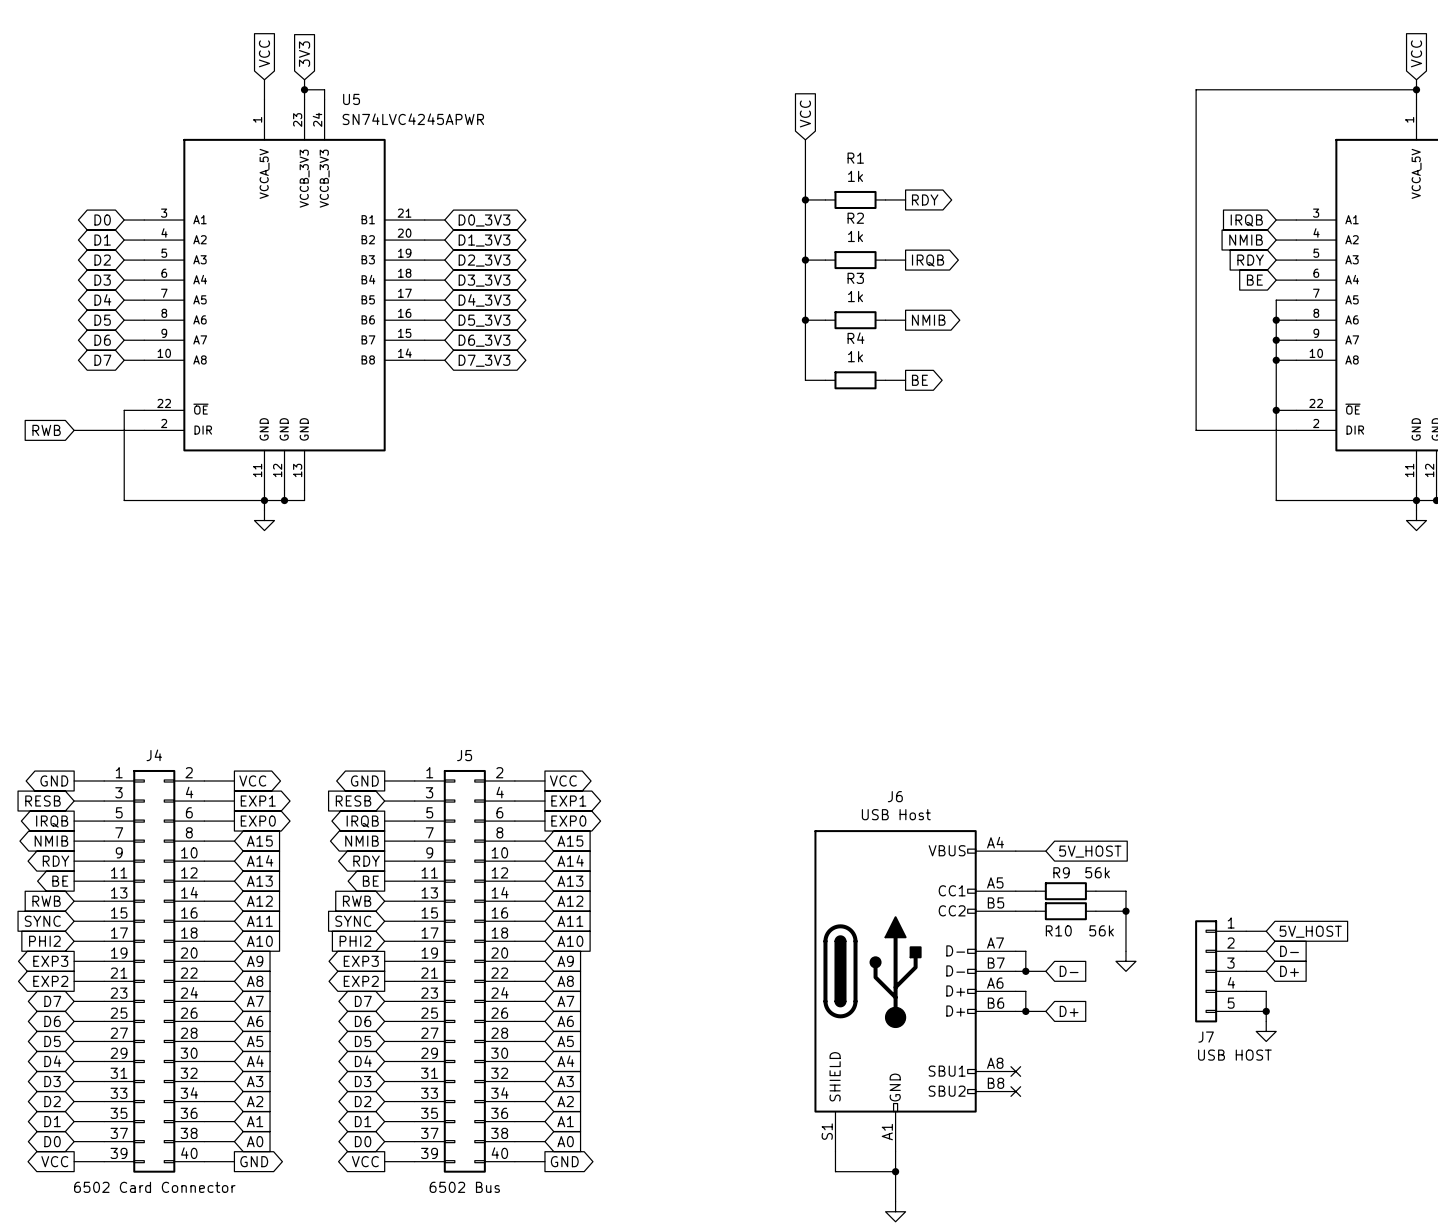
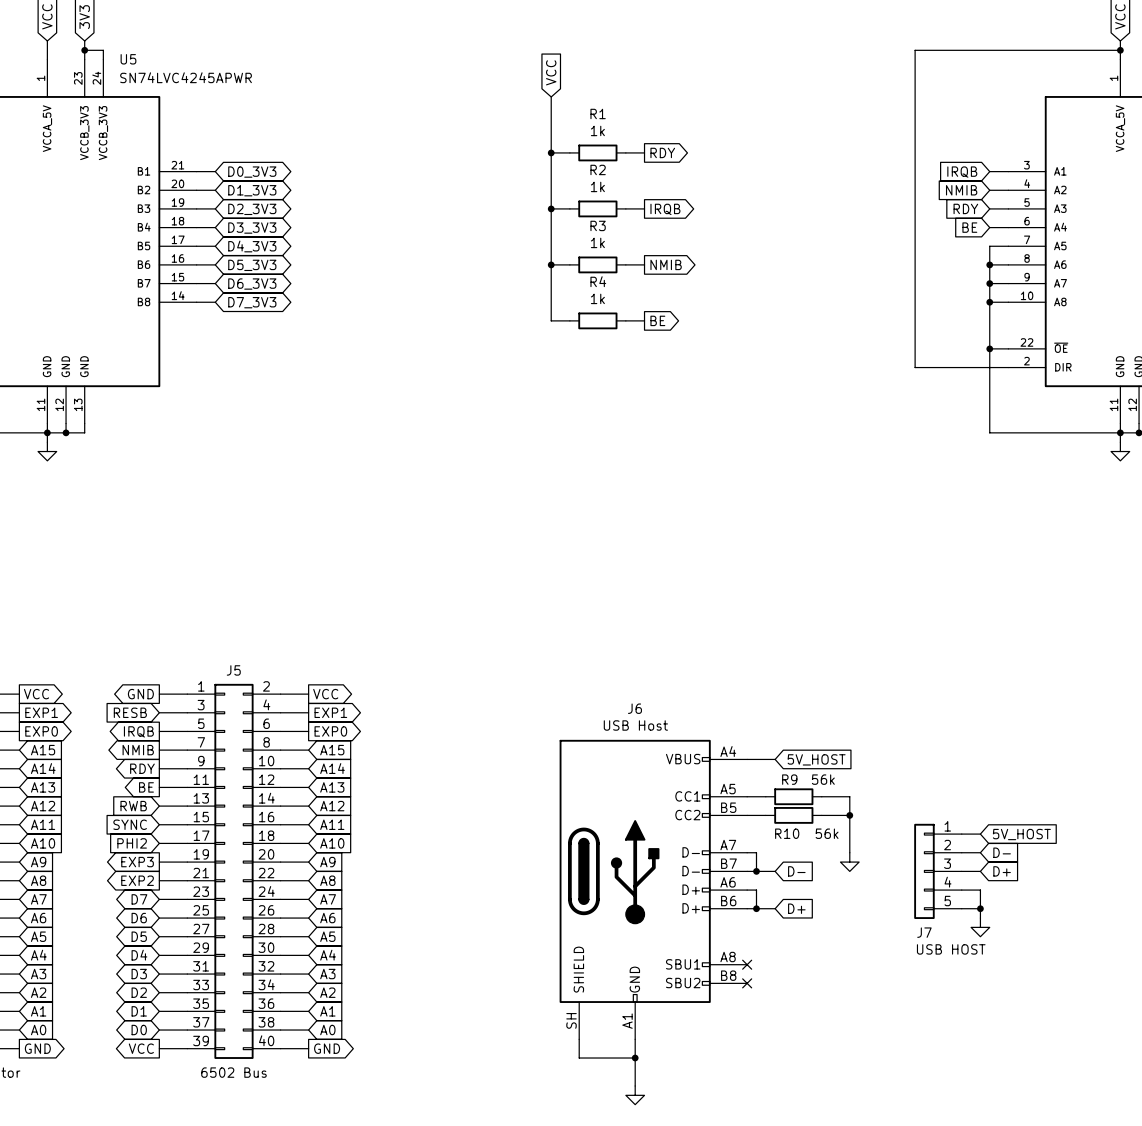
J6 pin number: S1 (827, 1131) -> SH (571, 1020)

